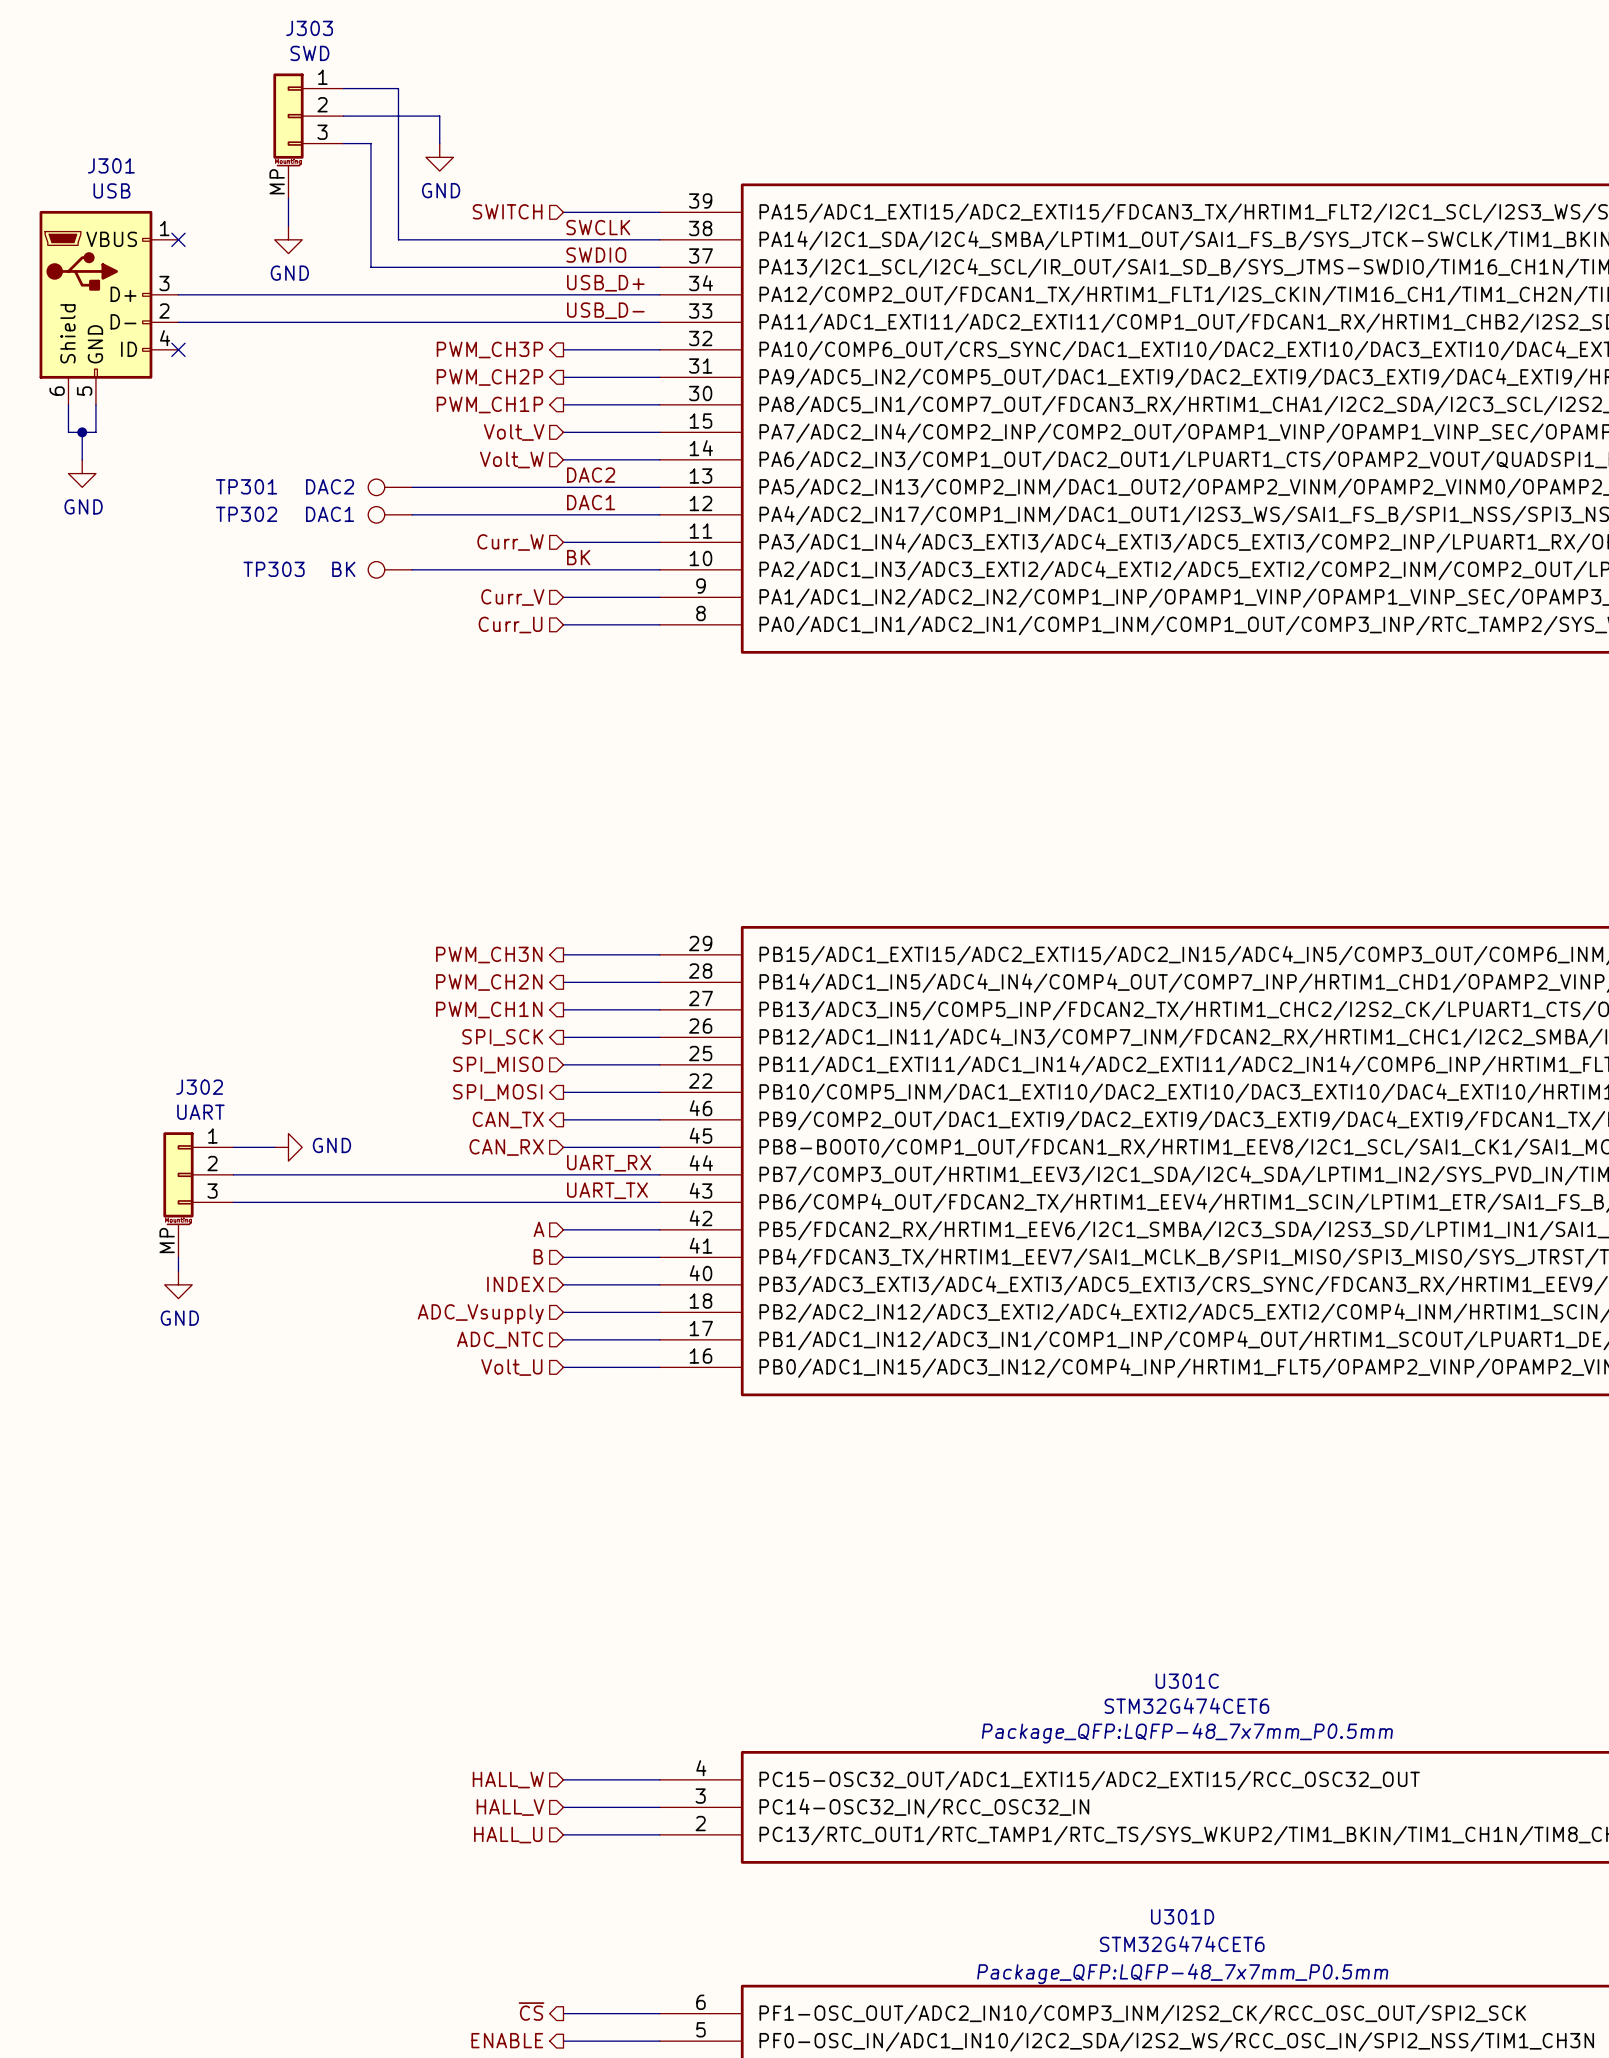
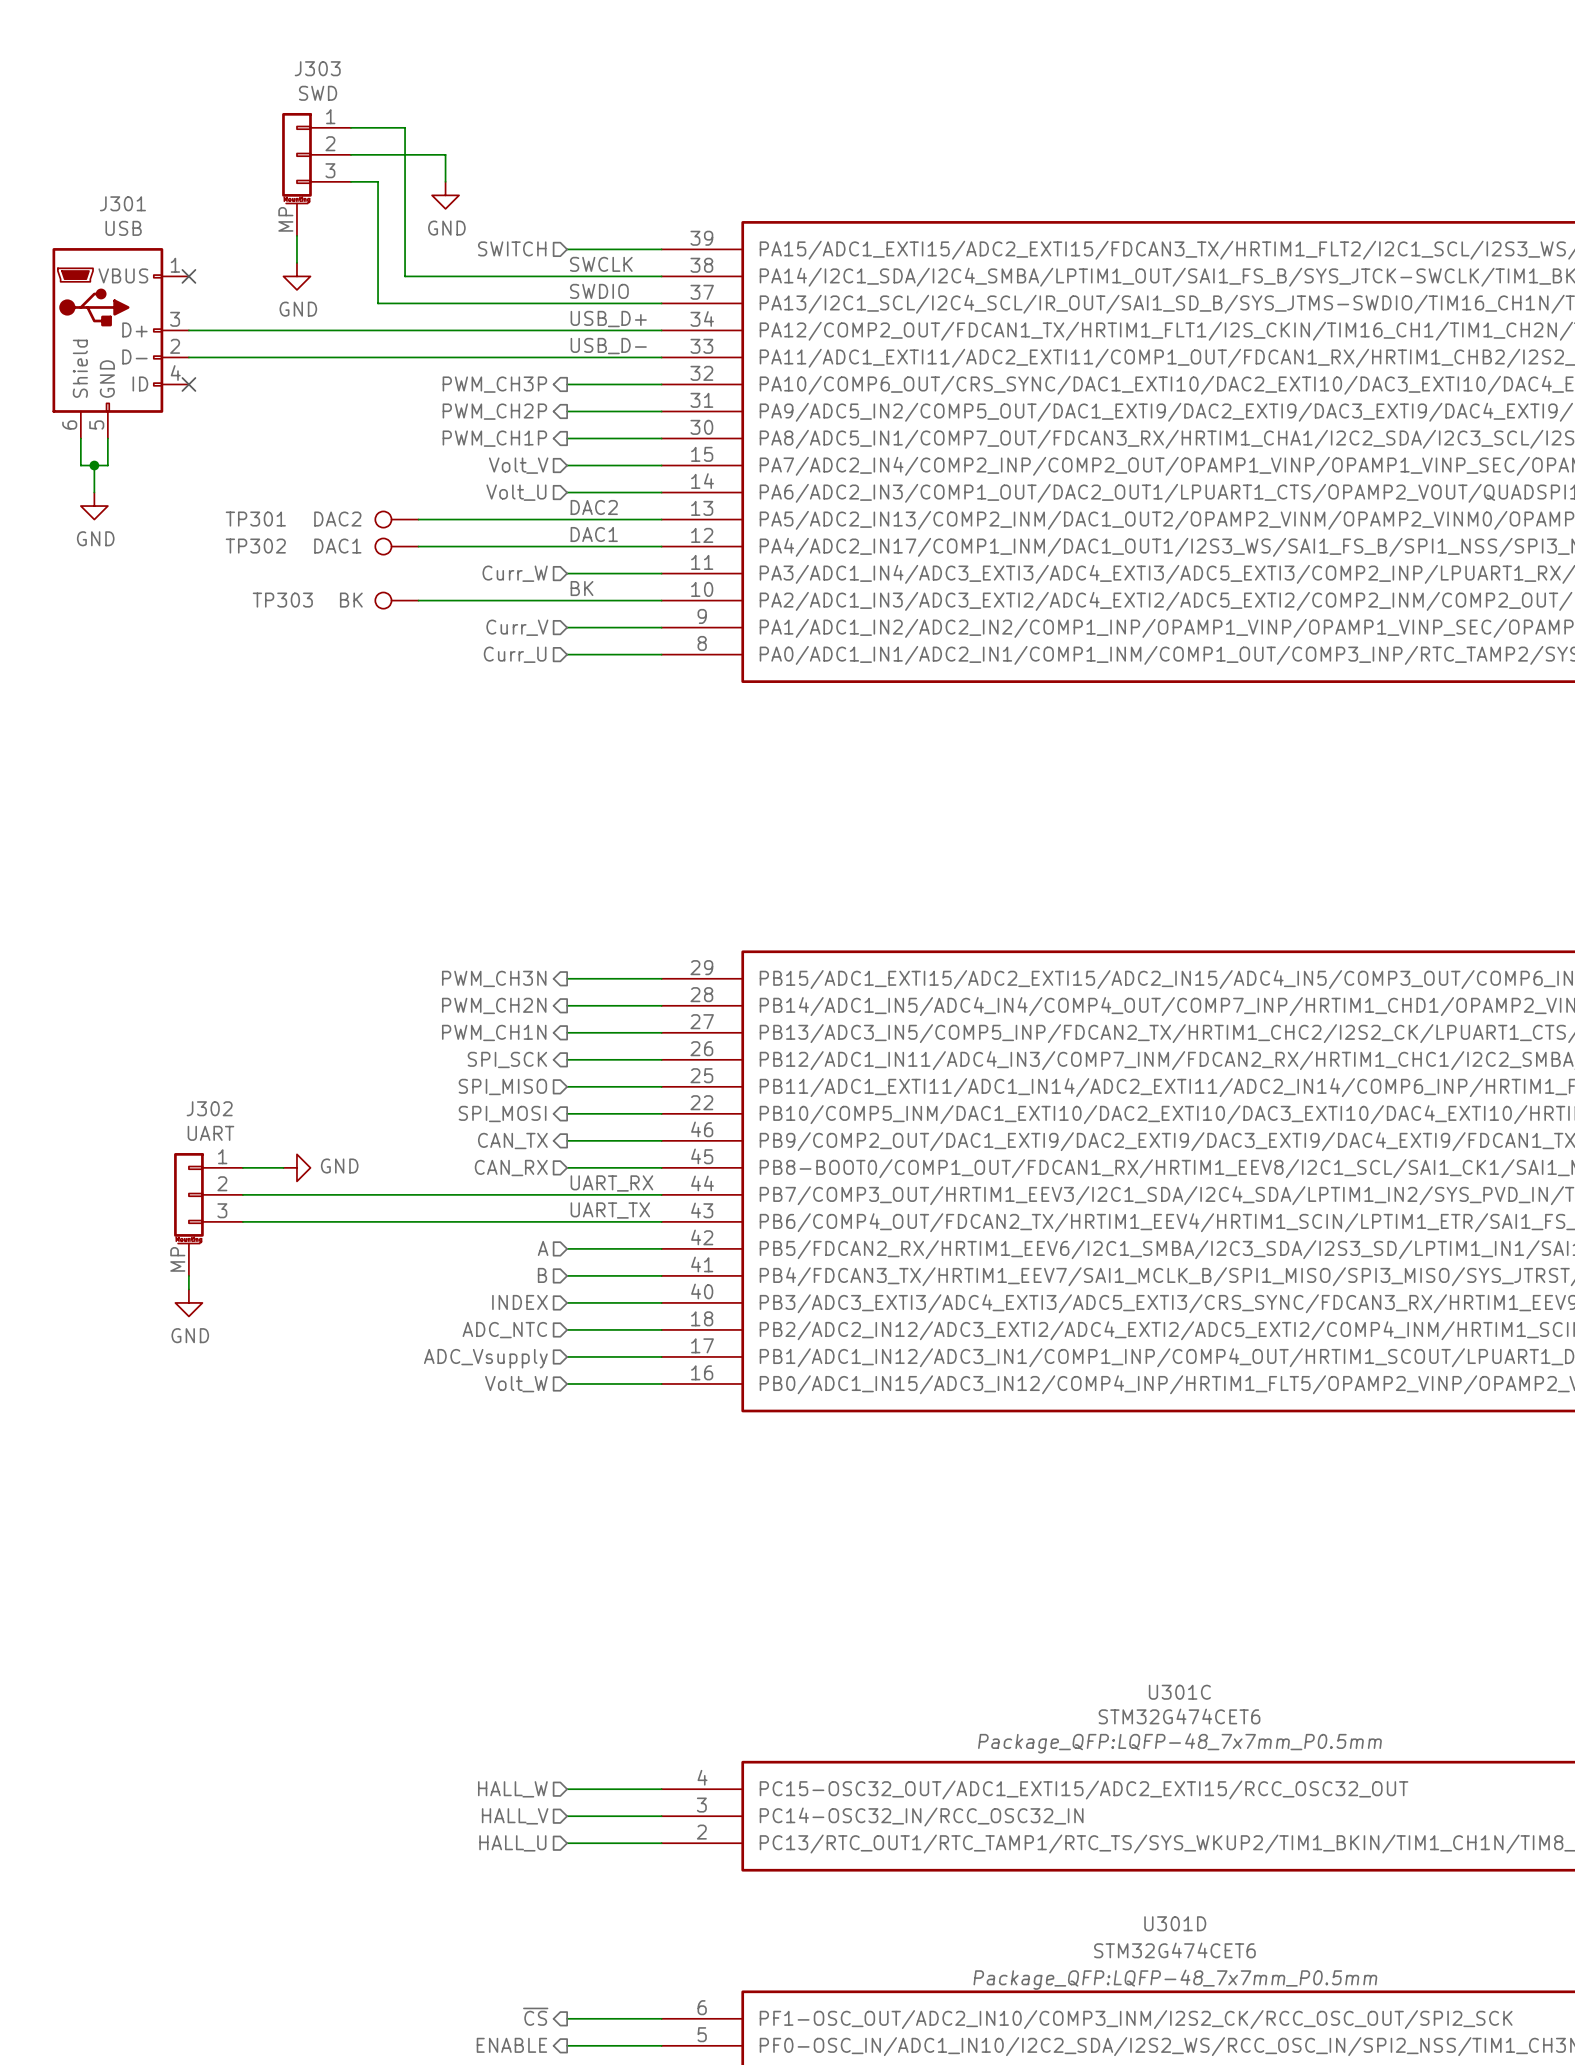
hierarchical label: Volt_W (511, 459) -> Volt_U (516, 492)
hierarchical label: ADC_Vsupply (480, 1314) -> ADC_NTC (504, 1330)
hierarchical label: ADC_NTC (500, 1340) -> ADC_Vsupply (485, 1358)
hierarchical label: Volt_U (511, 1367) -> Volt_W (516, 1384)

